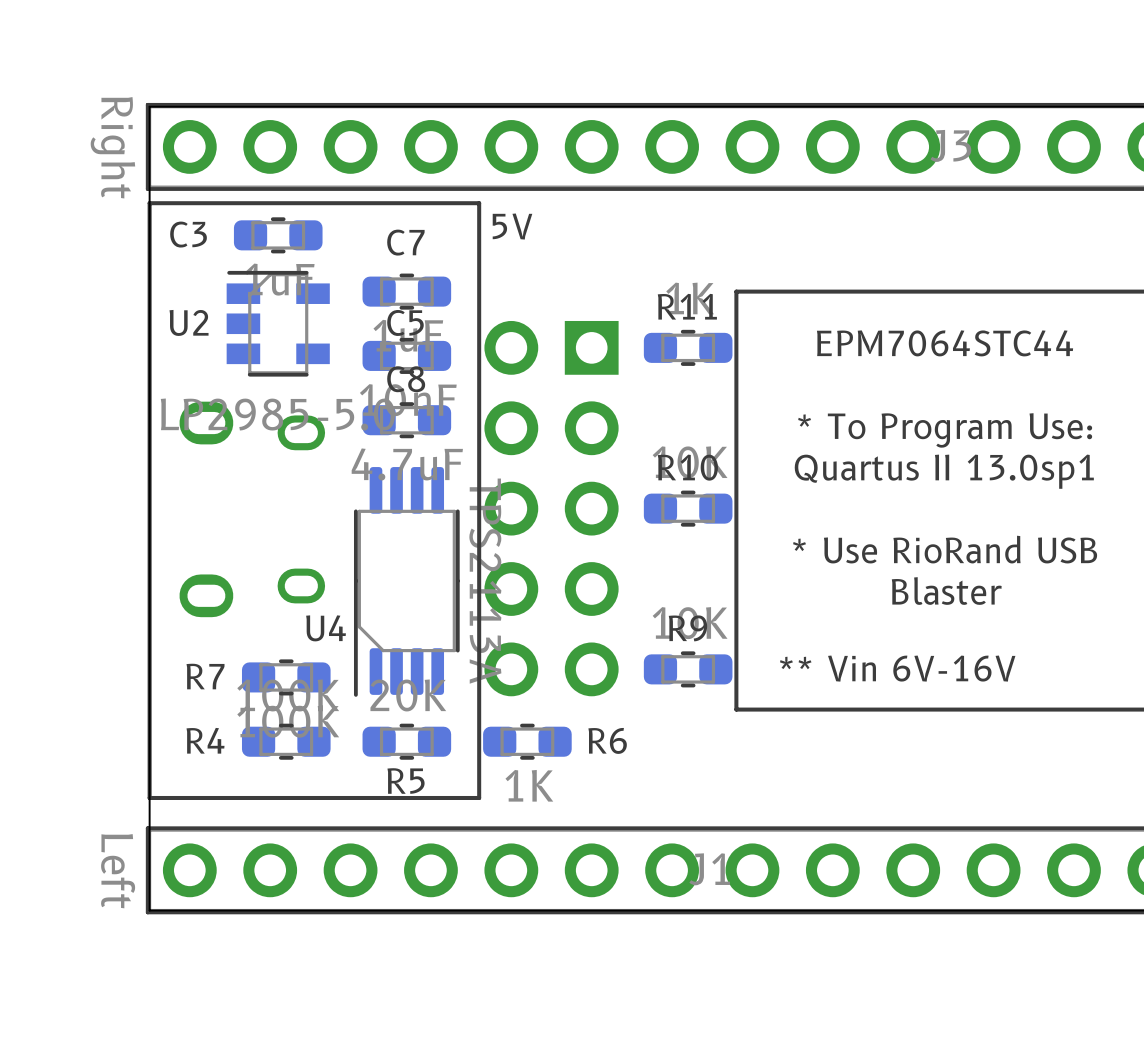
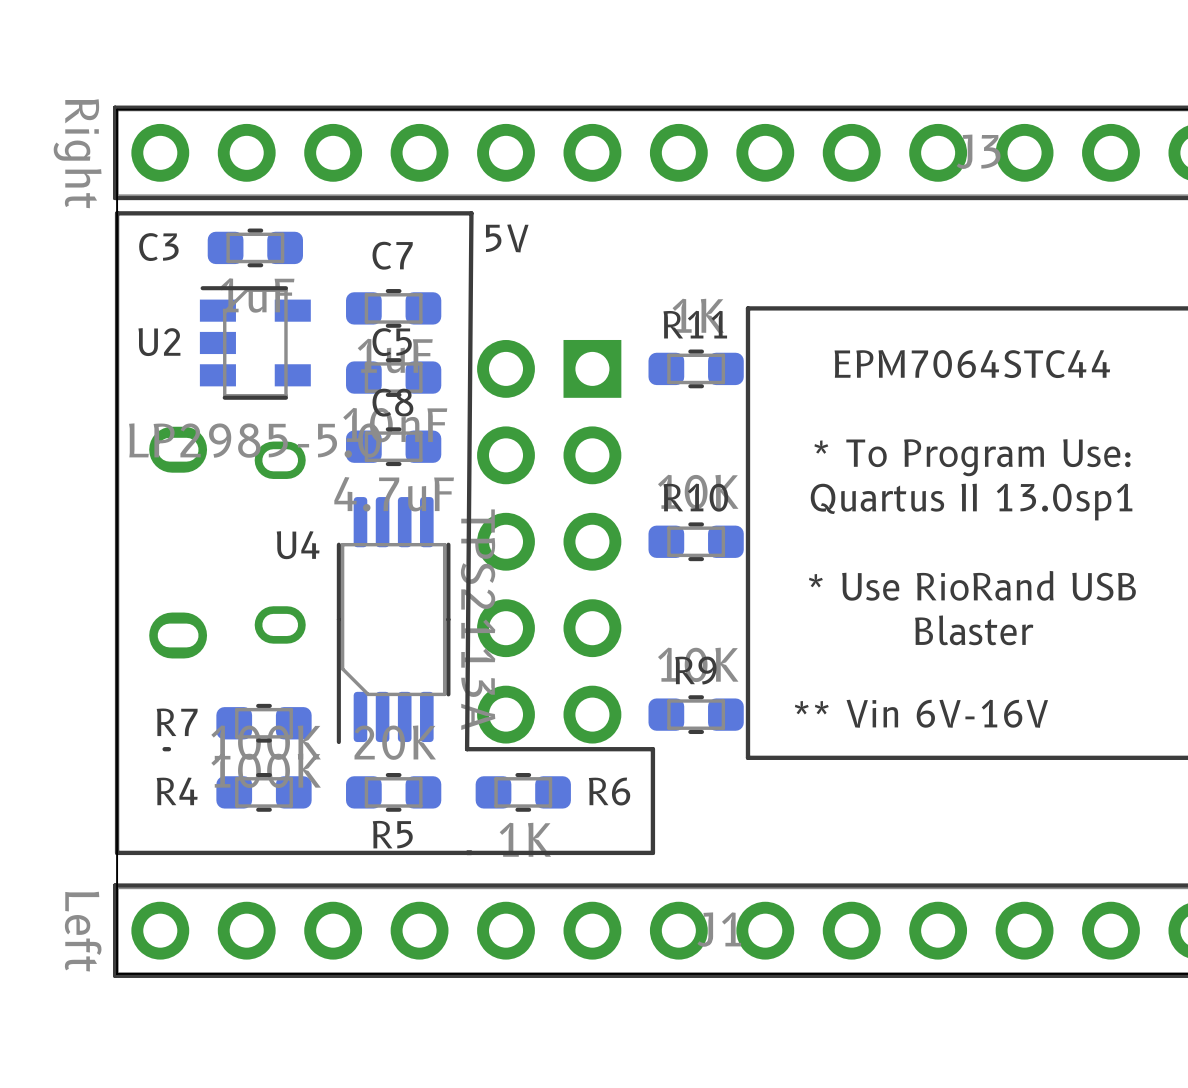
line: (479, 203) (479, 797) -> (471, 213) (467, 749) (652, 749) (652, 852) (471, 852)
U4 name position: U4 (326, 628) -> U4 (298, 545)
line: none -> (168, 749) (164, 749)

